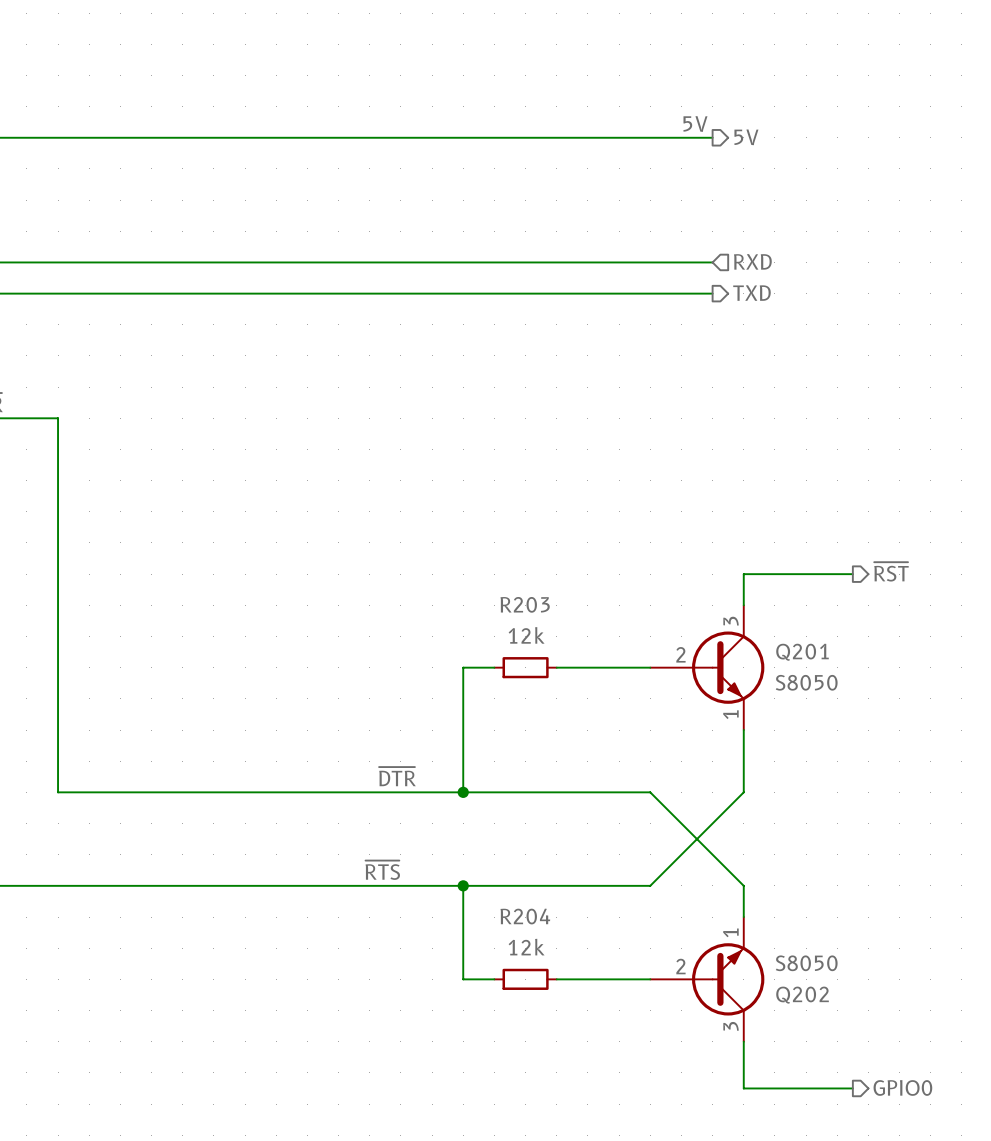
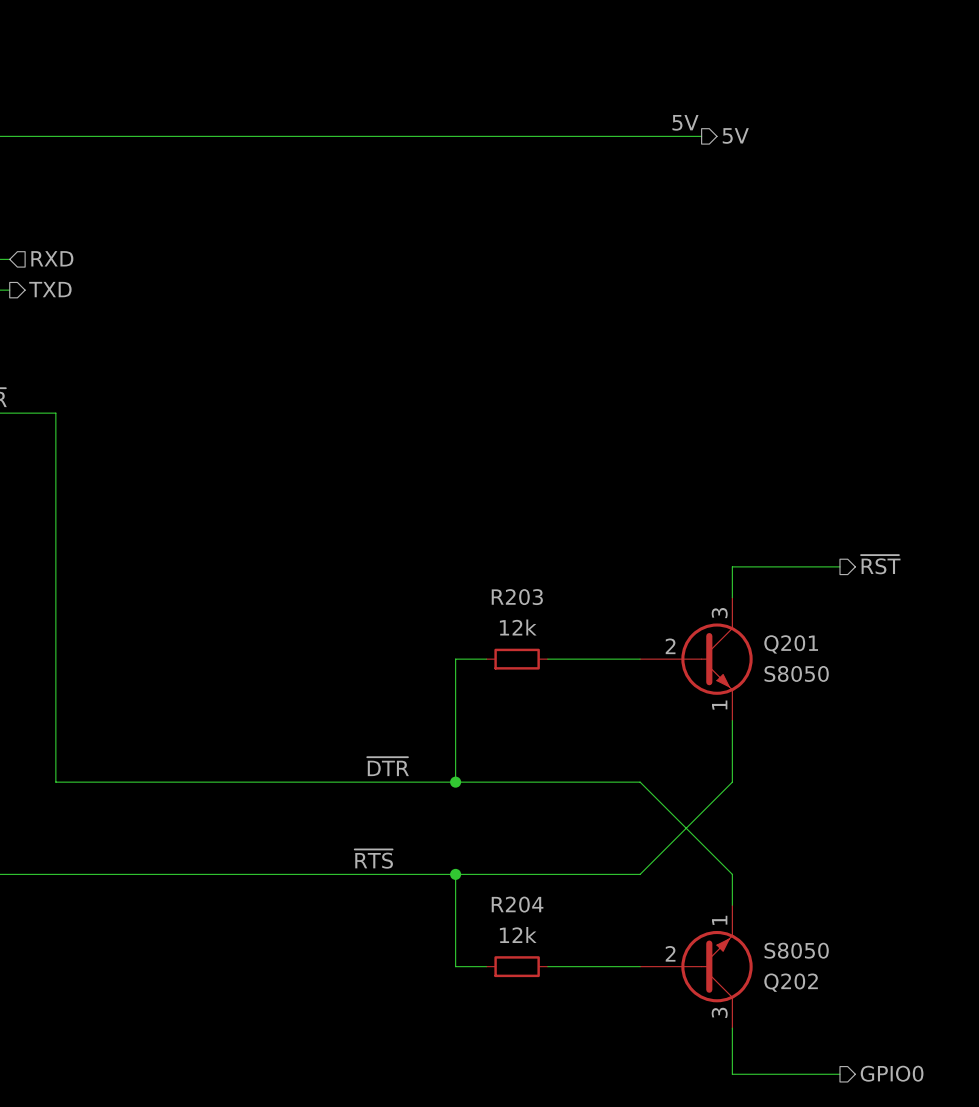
hierarchical label: none -> RXD (52, 258)
hierarchical label: RXD (752, 261) -> none
wire: (11, 262) (712, 262) -> none
wire: (11, 293) (712, 293) -> none
hierarchical label: none -> TXD (50, 289)
hierarchical label: TXD (751, 293) -> none

